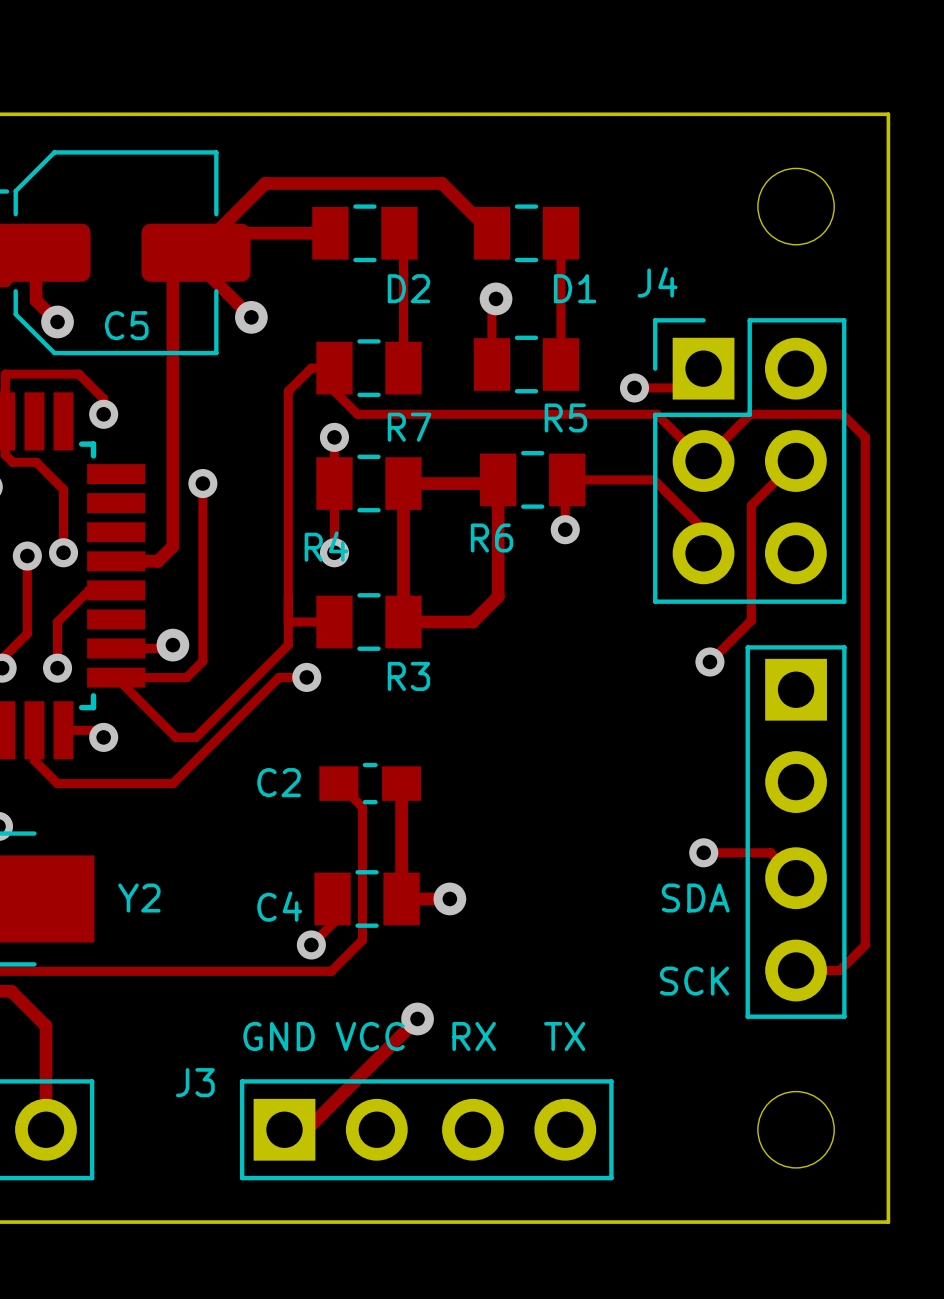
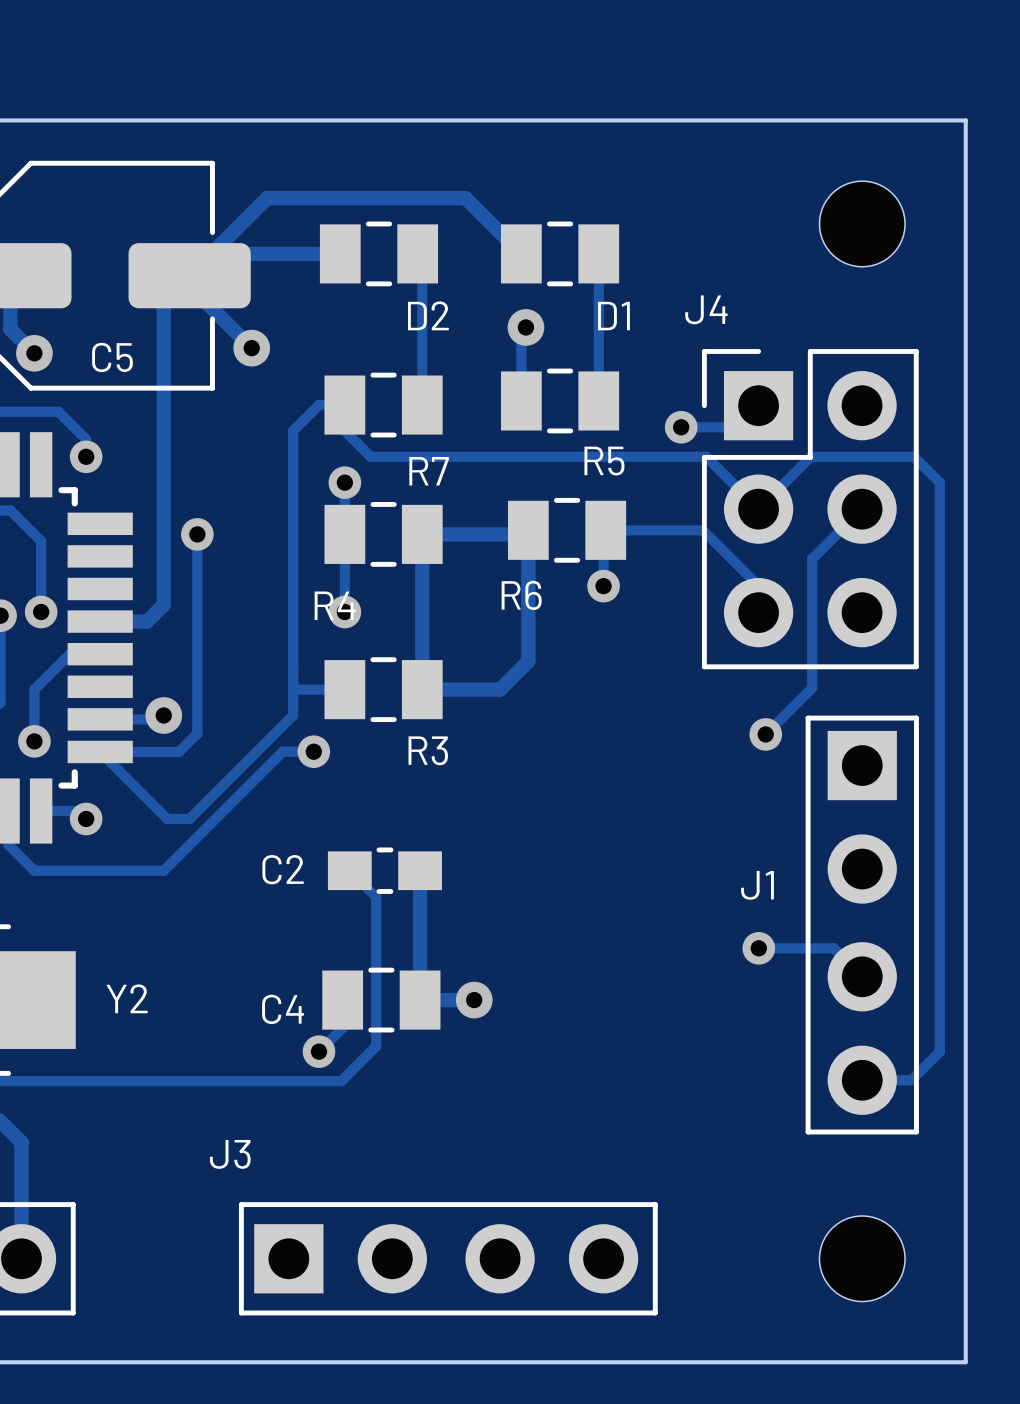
J1 name: none -> J1 (757, 885)
text: SDA (695, 898) -> none
text: SCK (694, 981) -> none
track: (417, 1018) (306, 1129) (284, 1129) -> none
via: (417, 1018) -> none
text: GND (279, 1036) -> none
text: VCC (370, 1036) -> none
text: RX (474, 1036) -> none
text: TX (564, 1036) -> none
J3 name position: J3 (195, 1082) -> J3 (230, 1154)

